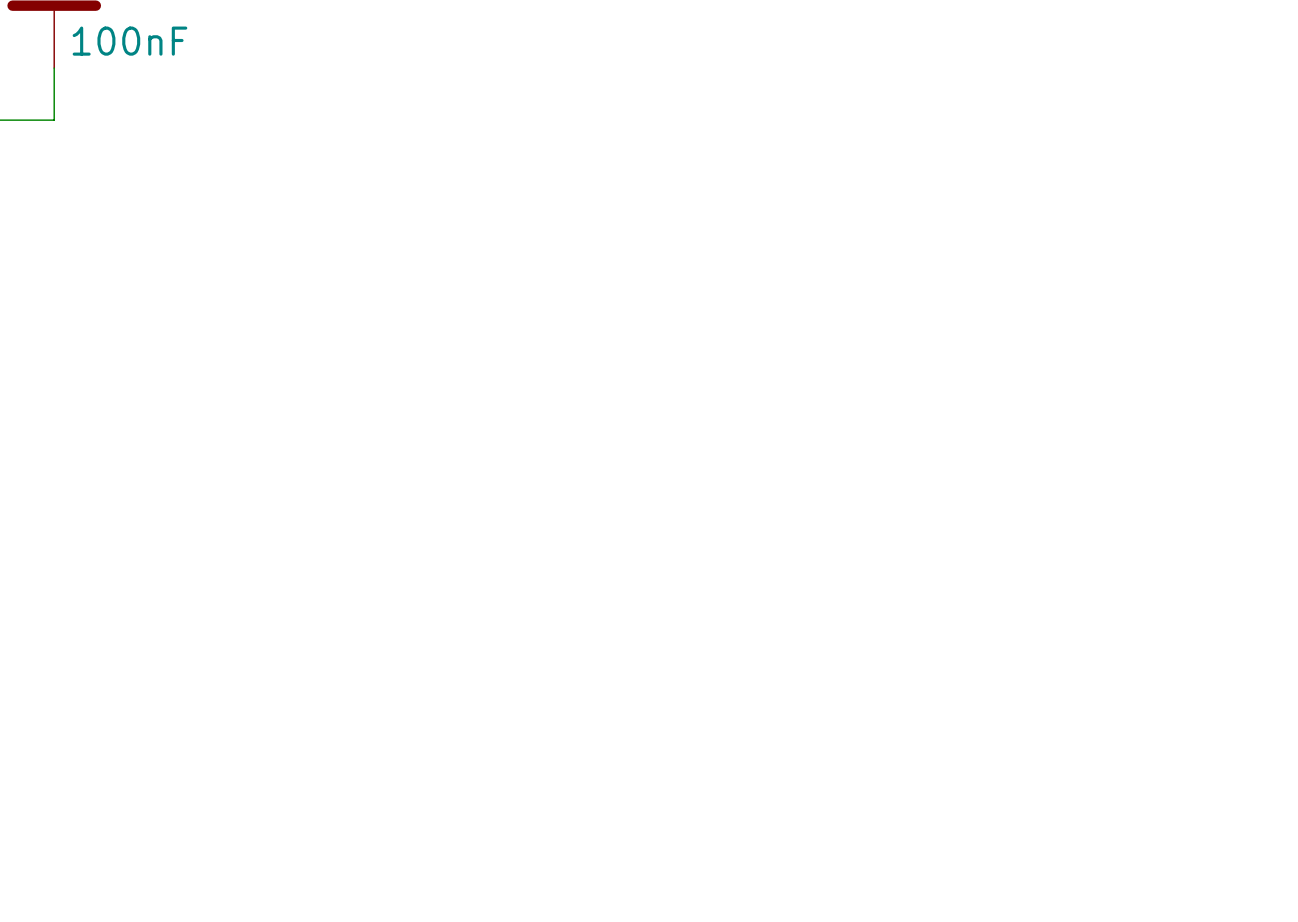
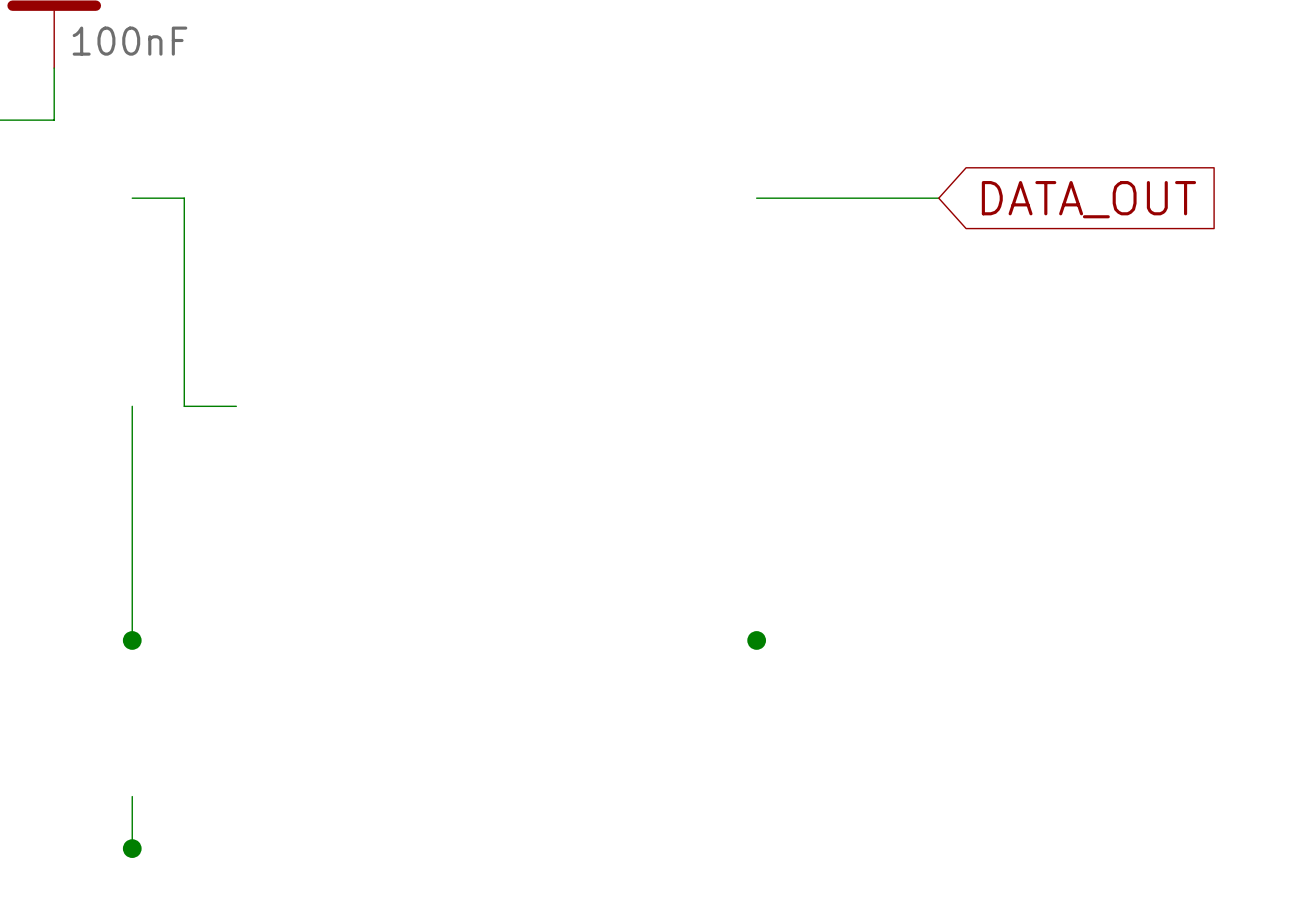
wire: none -> (132, 198) (184, 198) (184, 406) (236, 406)
wire: none -> (756, 198) (938, 198)
global label: none -> DATA_OUT (1088, 199)
wire: none -> (132, 406) (132, 640)
junction: none -> (132, 640)
junction: none -> (756, 640)
wire: none -> (132, 796) (132, 848)
junction: none -> (132, 848)

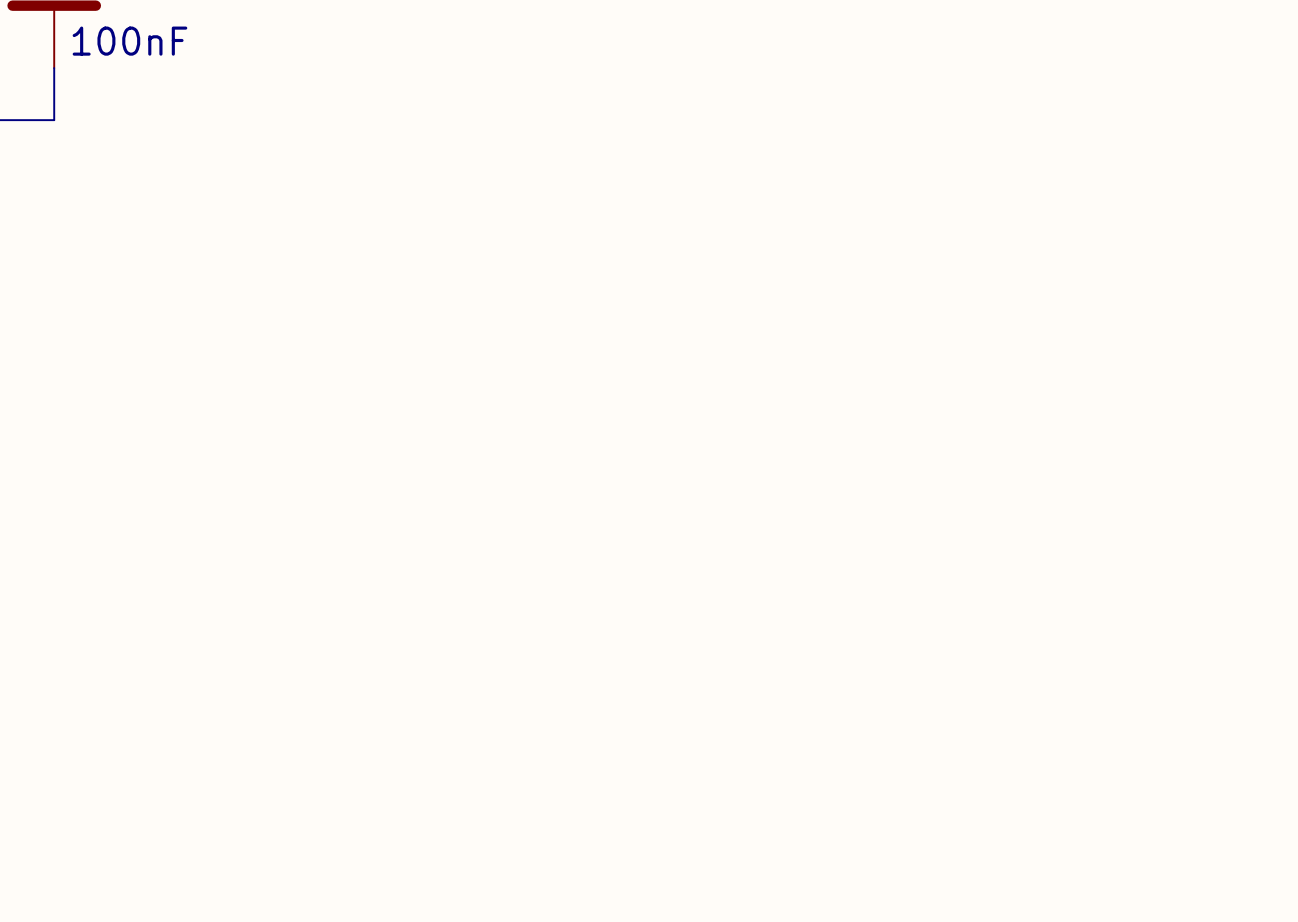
wire: (132, 198) (184, 198) (184, 406) (236, 406) -> none
wire: (756, 198) (938, 198) -> none
global label: DATA_OUT (1088, 199) -> none
wire: (132, 406) (132, 640) -> none
junction: (132, 640) -> none
junction: (756, 640) -> none
wire: (132, 796) (132, 848) -> none
junction: (132, 848) -> none

